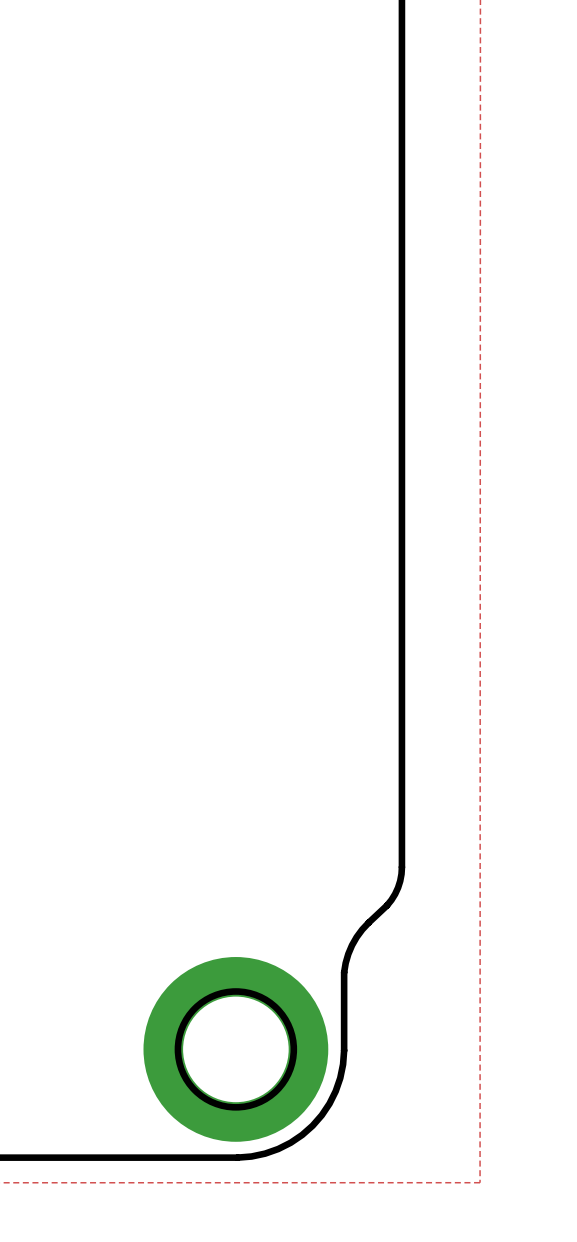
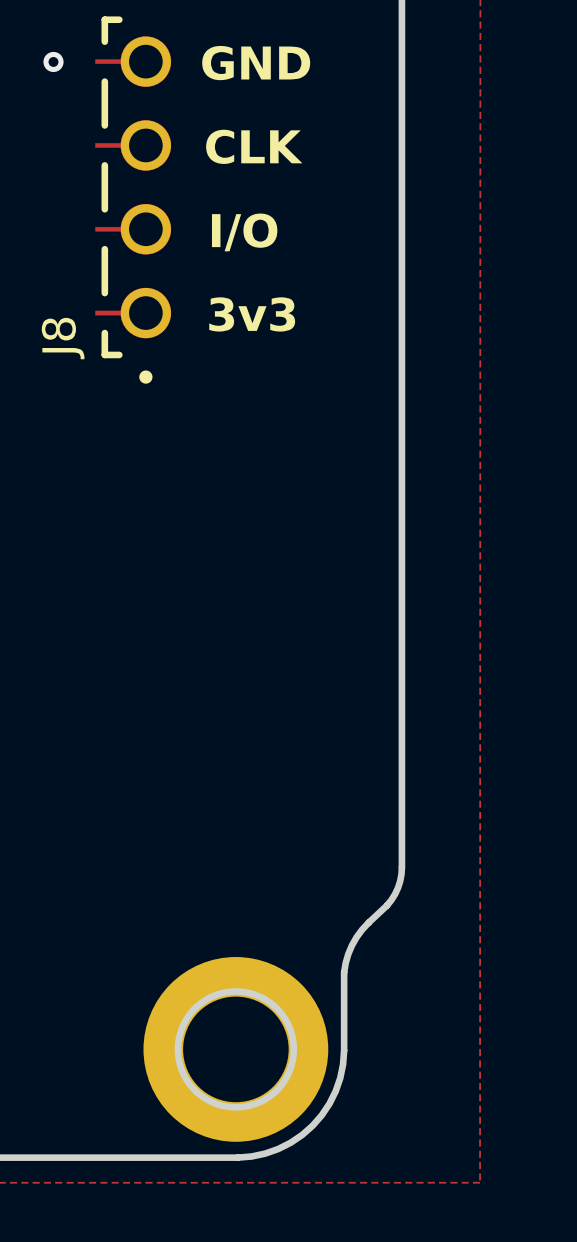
via: none -> (53, 61)
text: none -> GND (256, 63)
text: none -> CLK (254, 146)
J8: none -> (133, 200)
text: none -> I/O (244, 232)
text: none -> 3v3 (252, 314)

